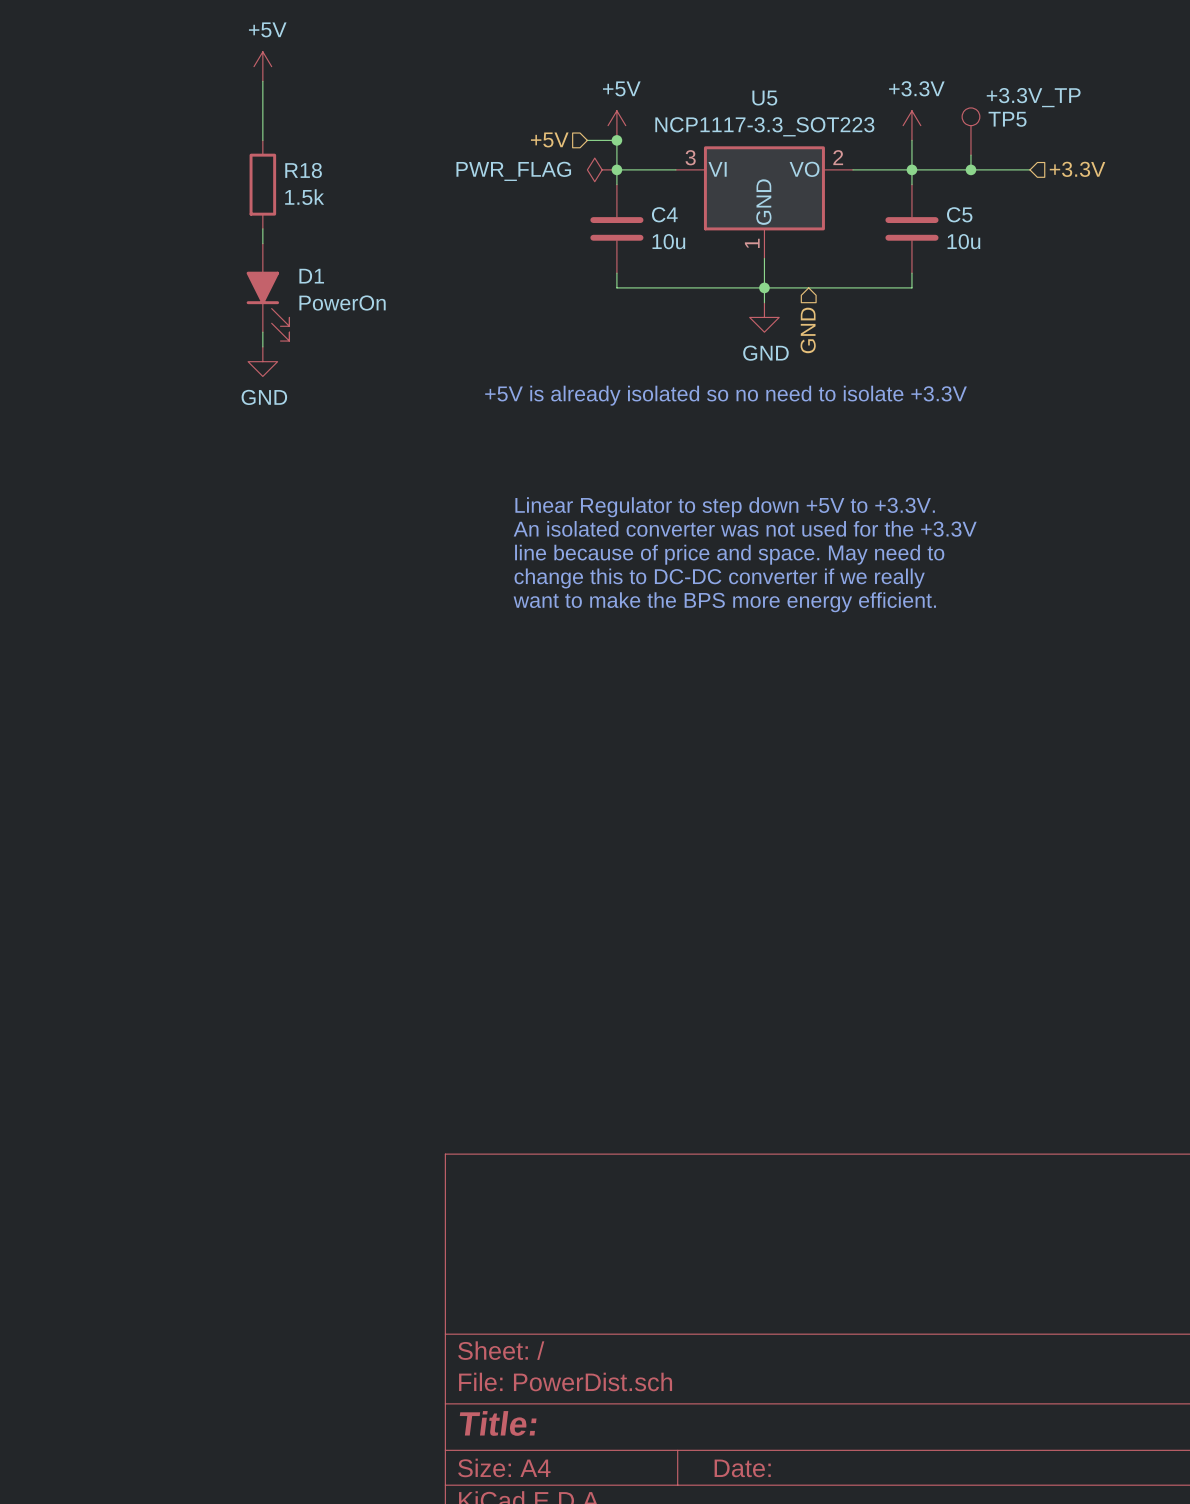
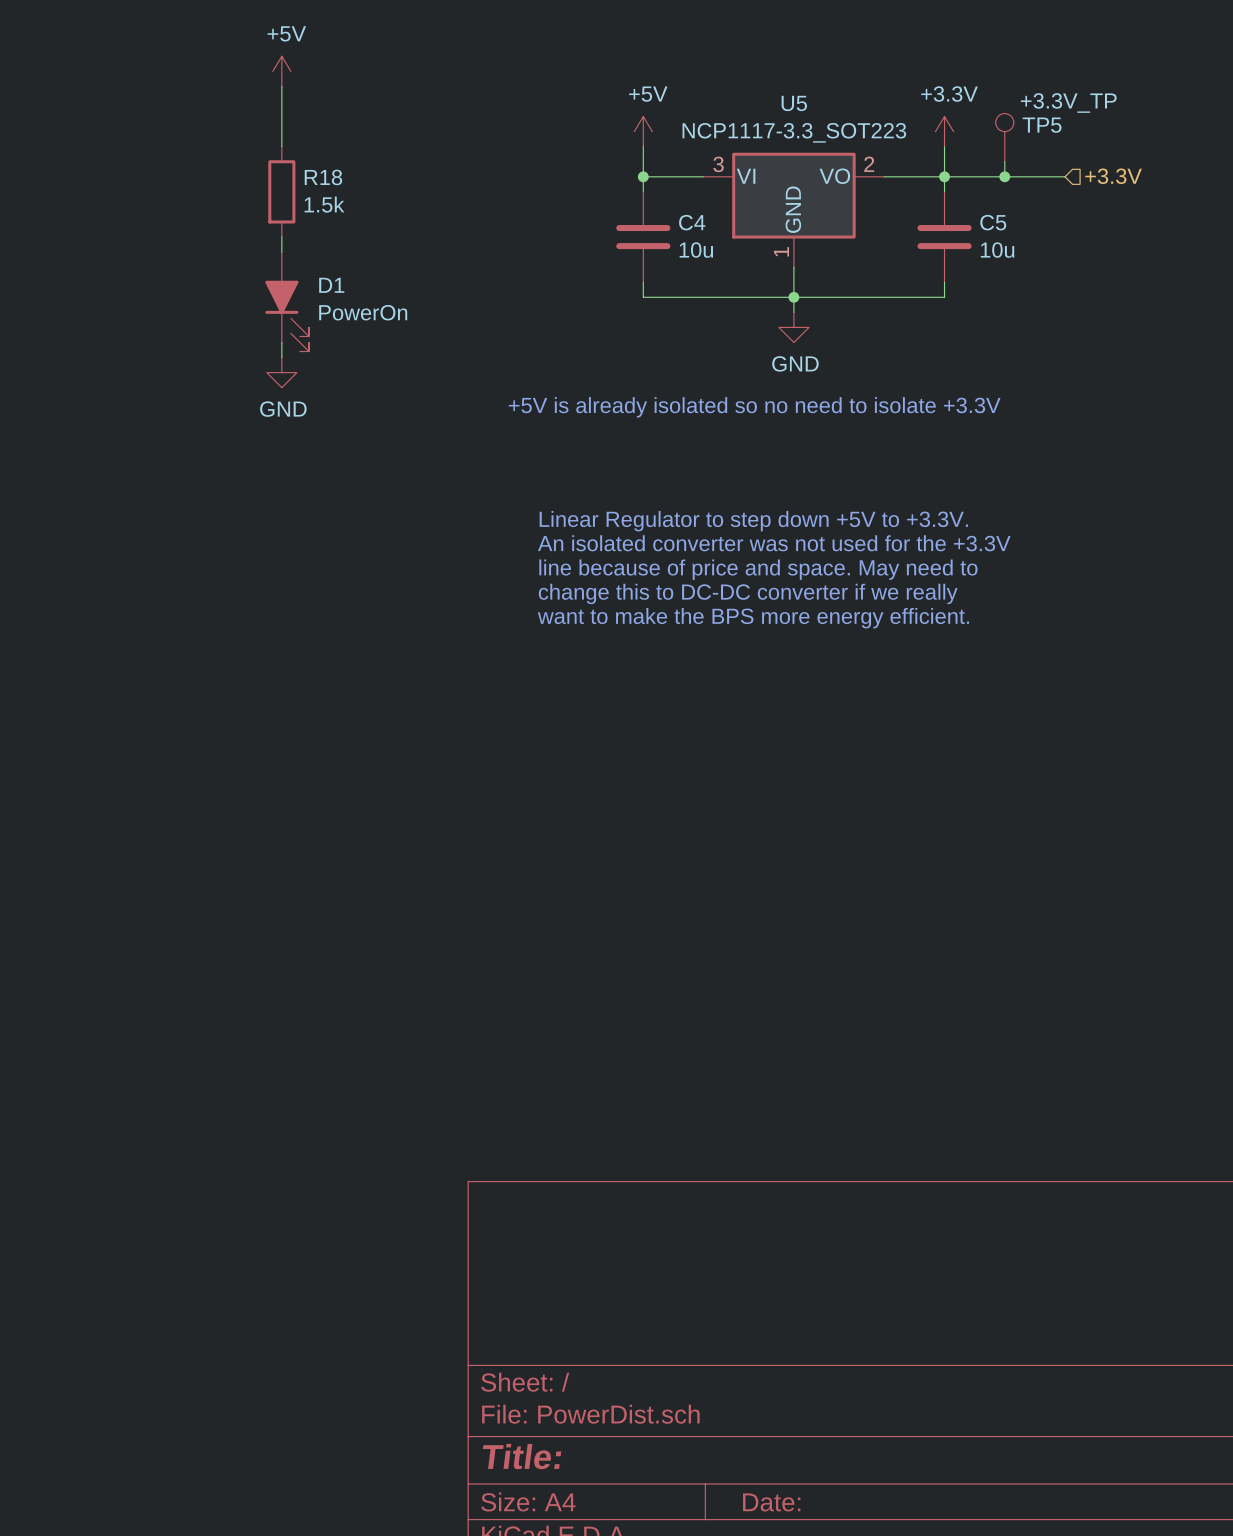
hierarchical label: +5V (549, 139) -> none
wire: (587, 140) (616, 140) -> none
junction: (616, 140) -> none
power symbol: PWR_FLAG (602, 169) -> none
hierarchical label: GND (808, 330) -> none

